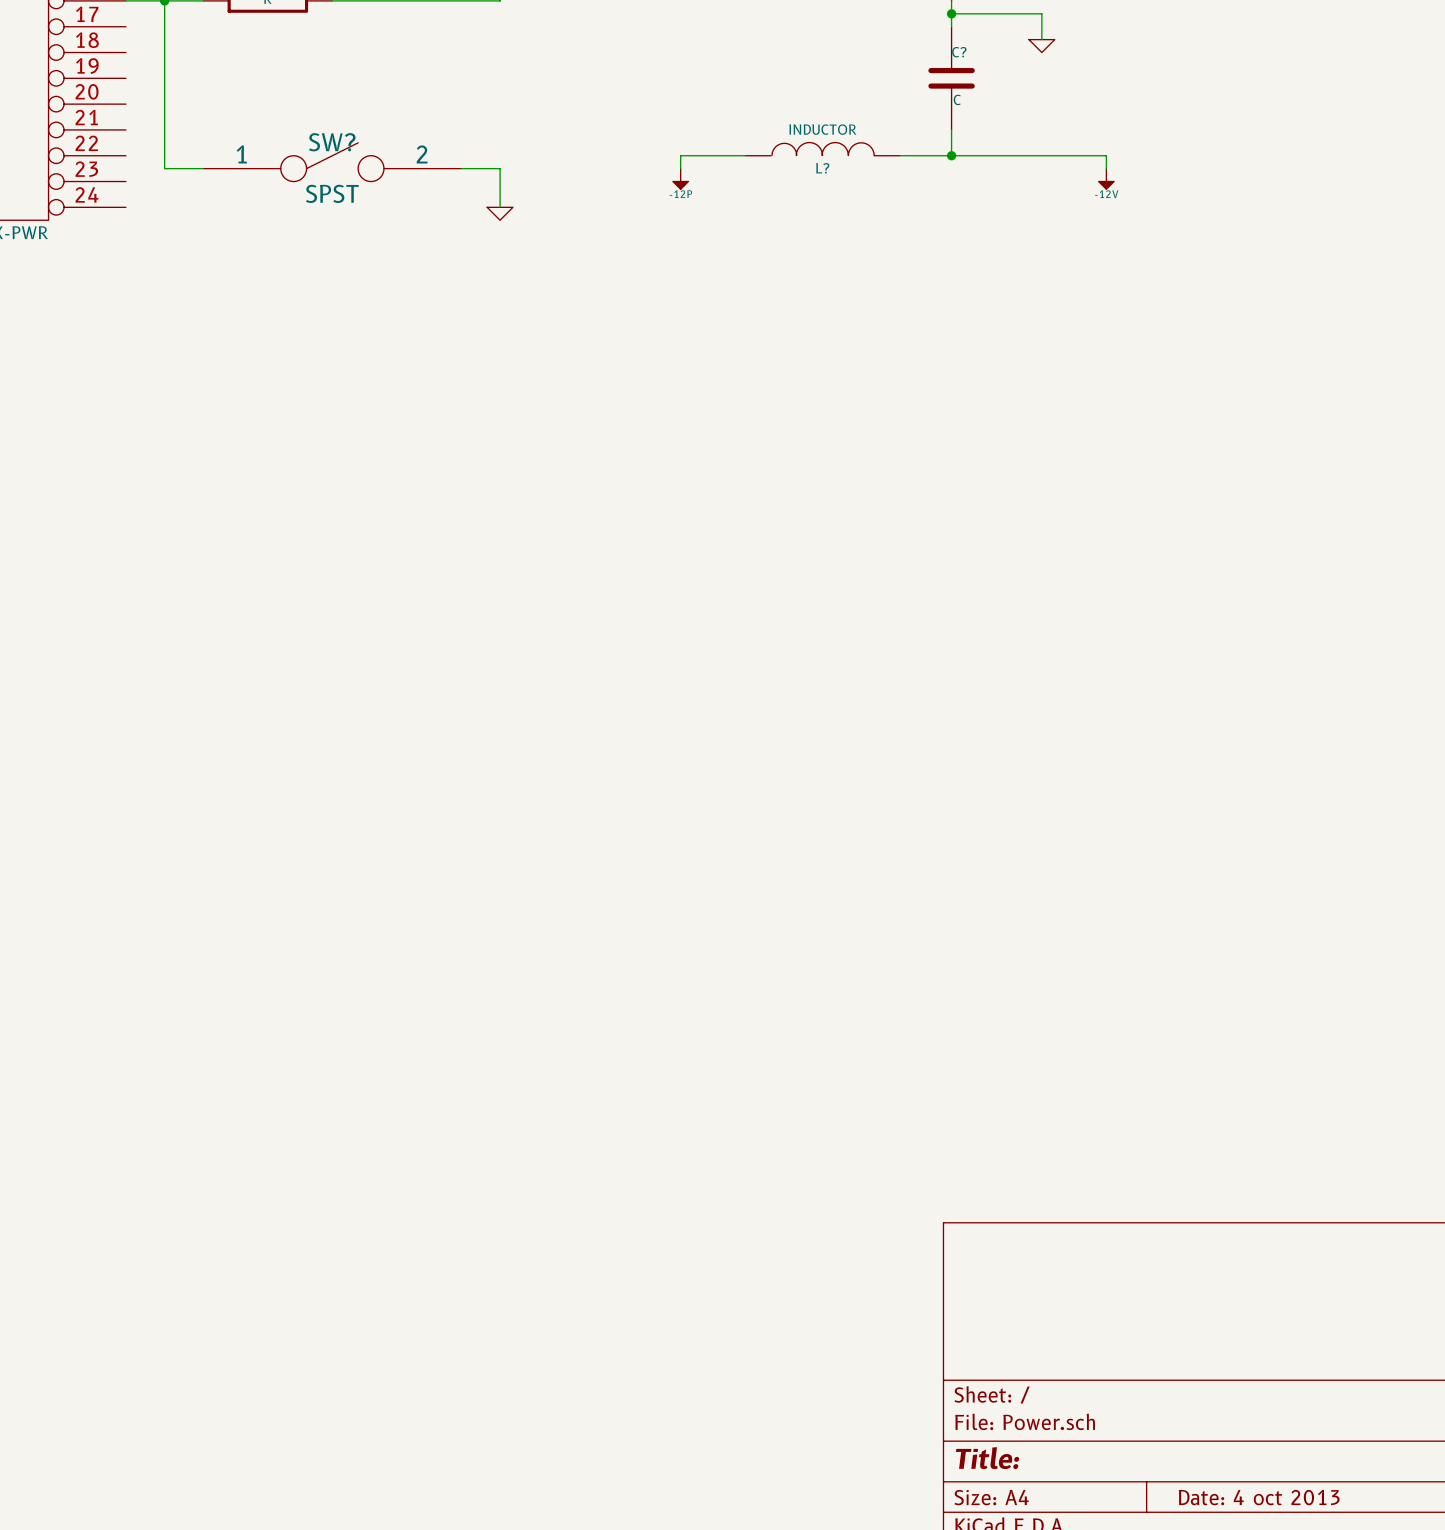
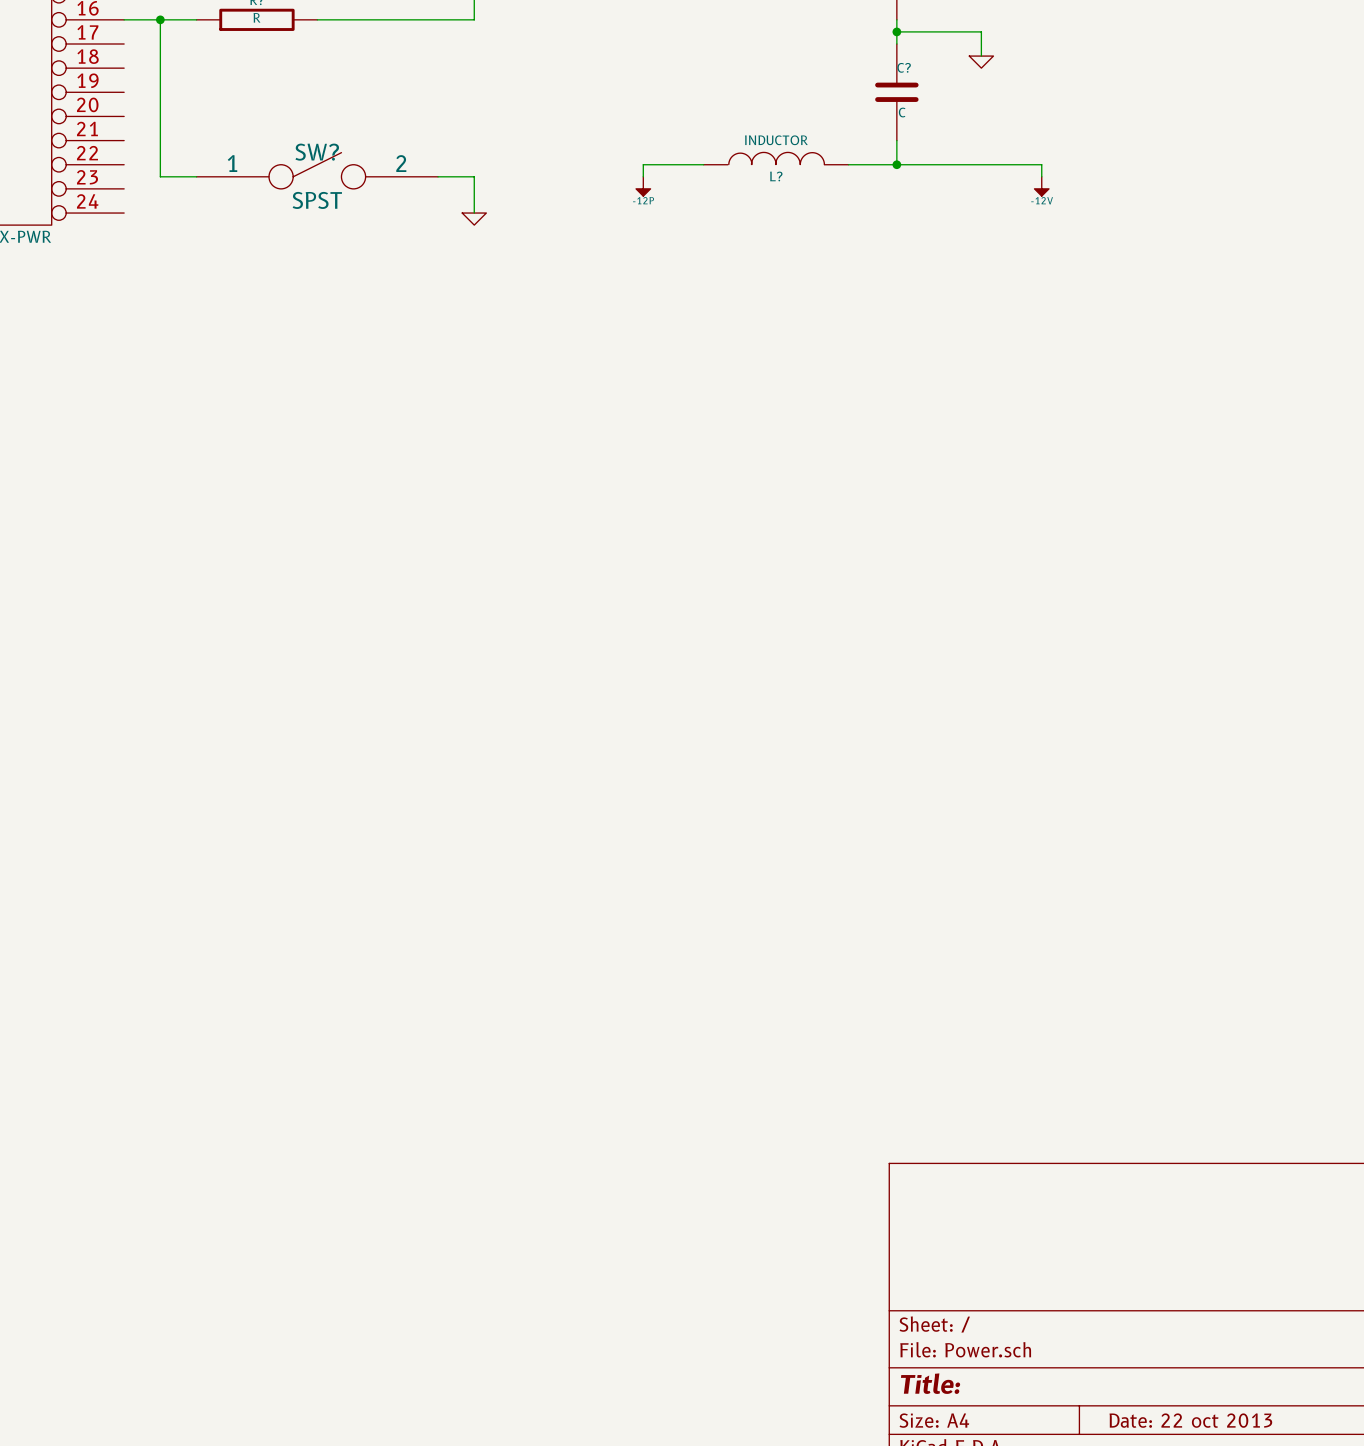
title block: Date: 4 oct 2013 (1259, 1497) -> Date: 22 oct 2013 (1190, 1420)

